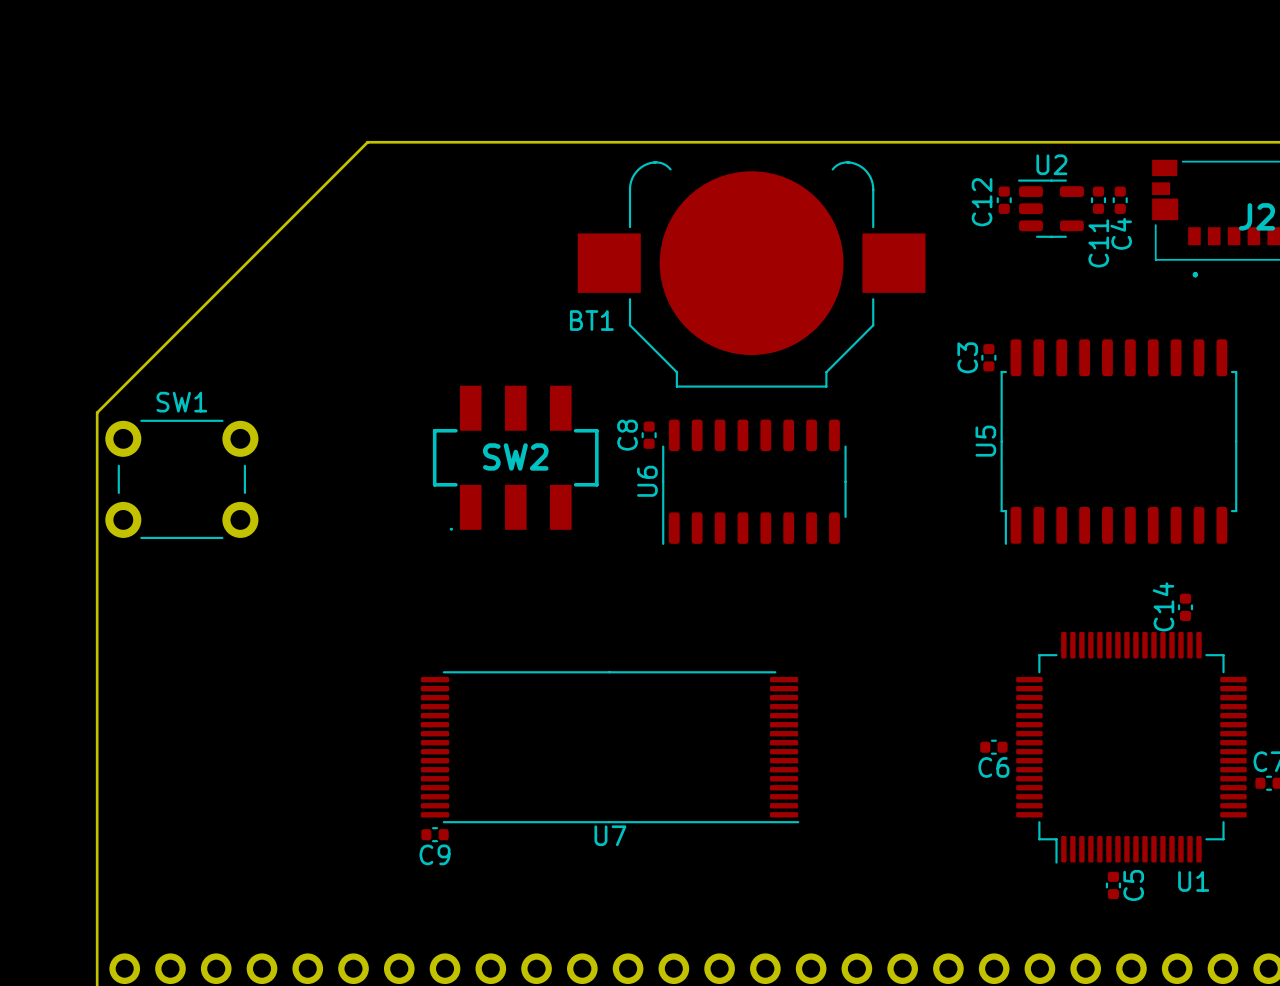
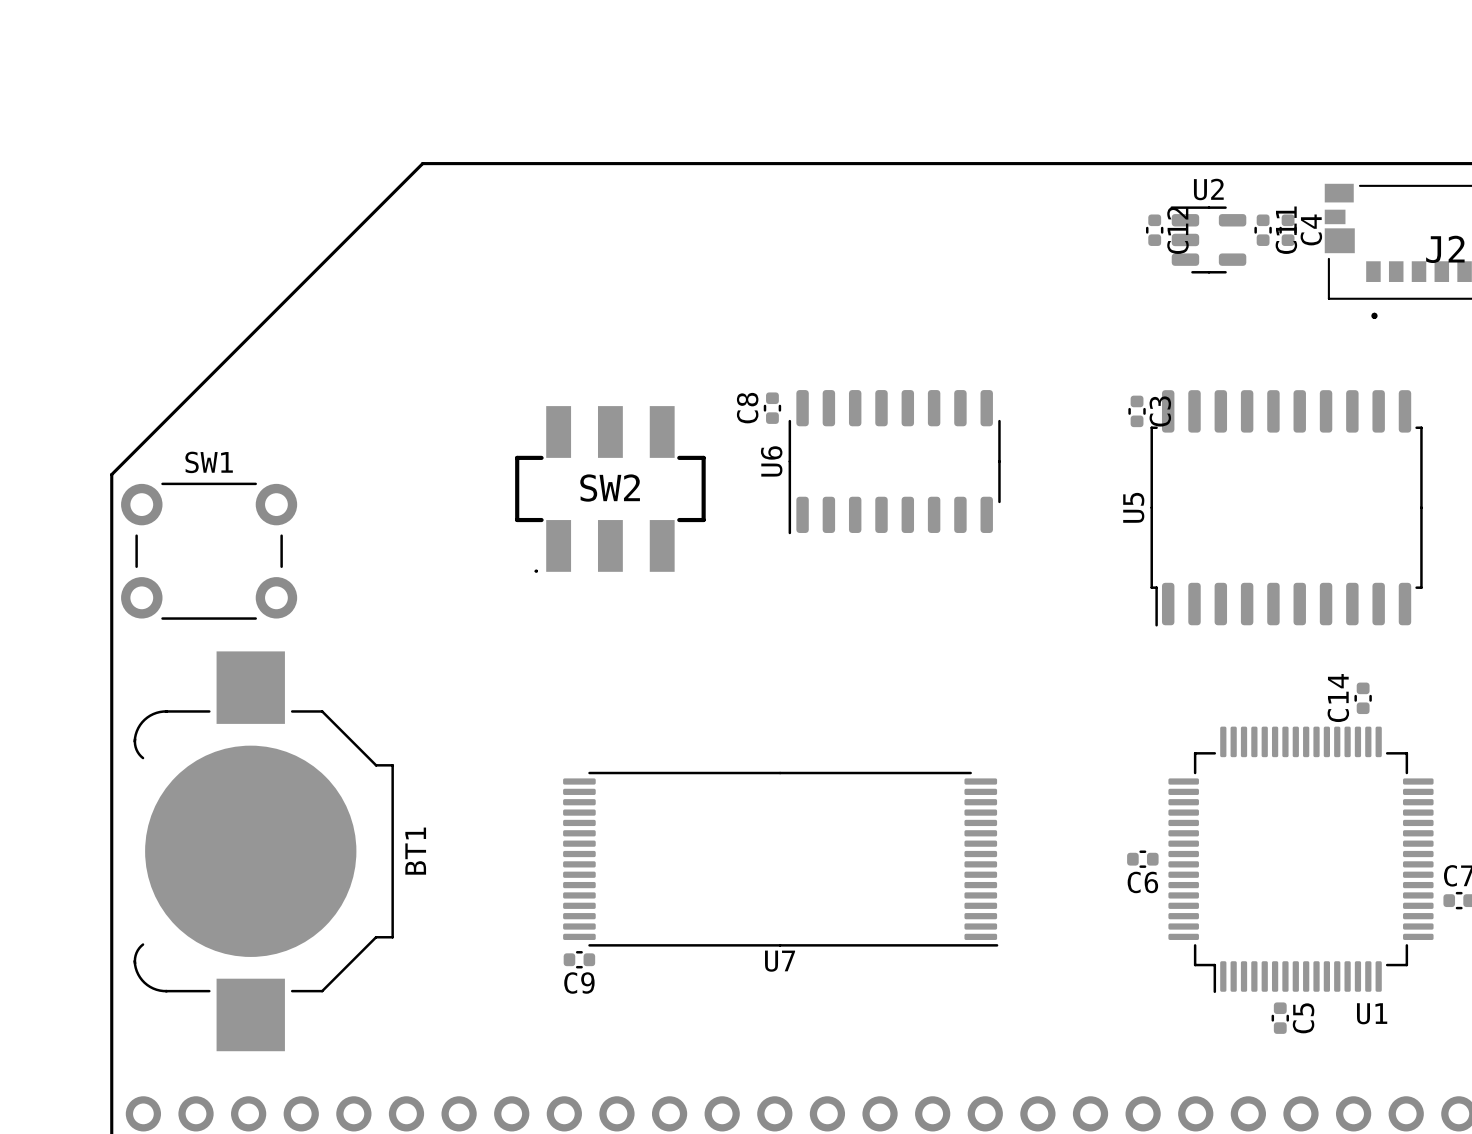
C12 name position: C12 (982, 202) -> C12 (1177, 230)
C4 name position: C4 (1121, 233) -> C4 (1311, 229)
C11 name position: C11 (1098, 243) -> C11 (1286, 230)
BT1 rotation: 0° (751, 274) -> 90° counterclockwise (263, 851)
BT1 position: (751, 274) -> (263, 851)
BT1 name position: BT1 (591, 320) -> BT1 (415, 851)
C3 name position: C3 (967, 357) -> C3 (1160, 411)
C8 position: (649, 435) -> (772, 408)
SW2 position: (515, 458) -> (610, 489)
U6 position: (754, 482) -> (894, 462)
U7 position: (610, 747) -> (780, 859)
C9 position: (435, 834) -> (579, 959)

